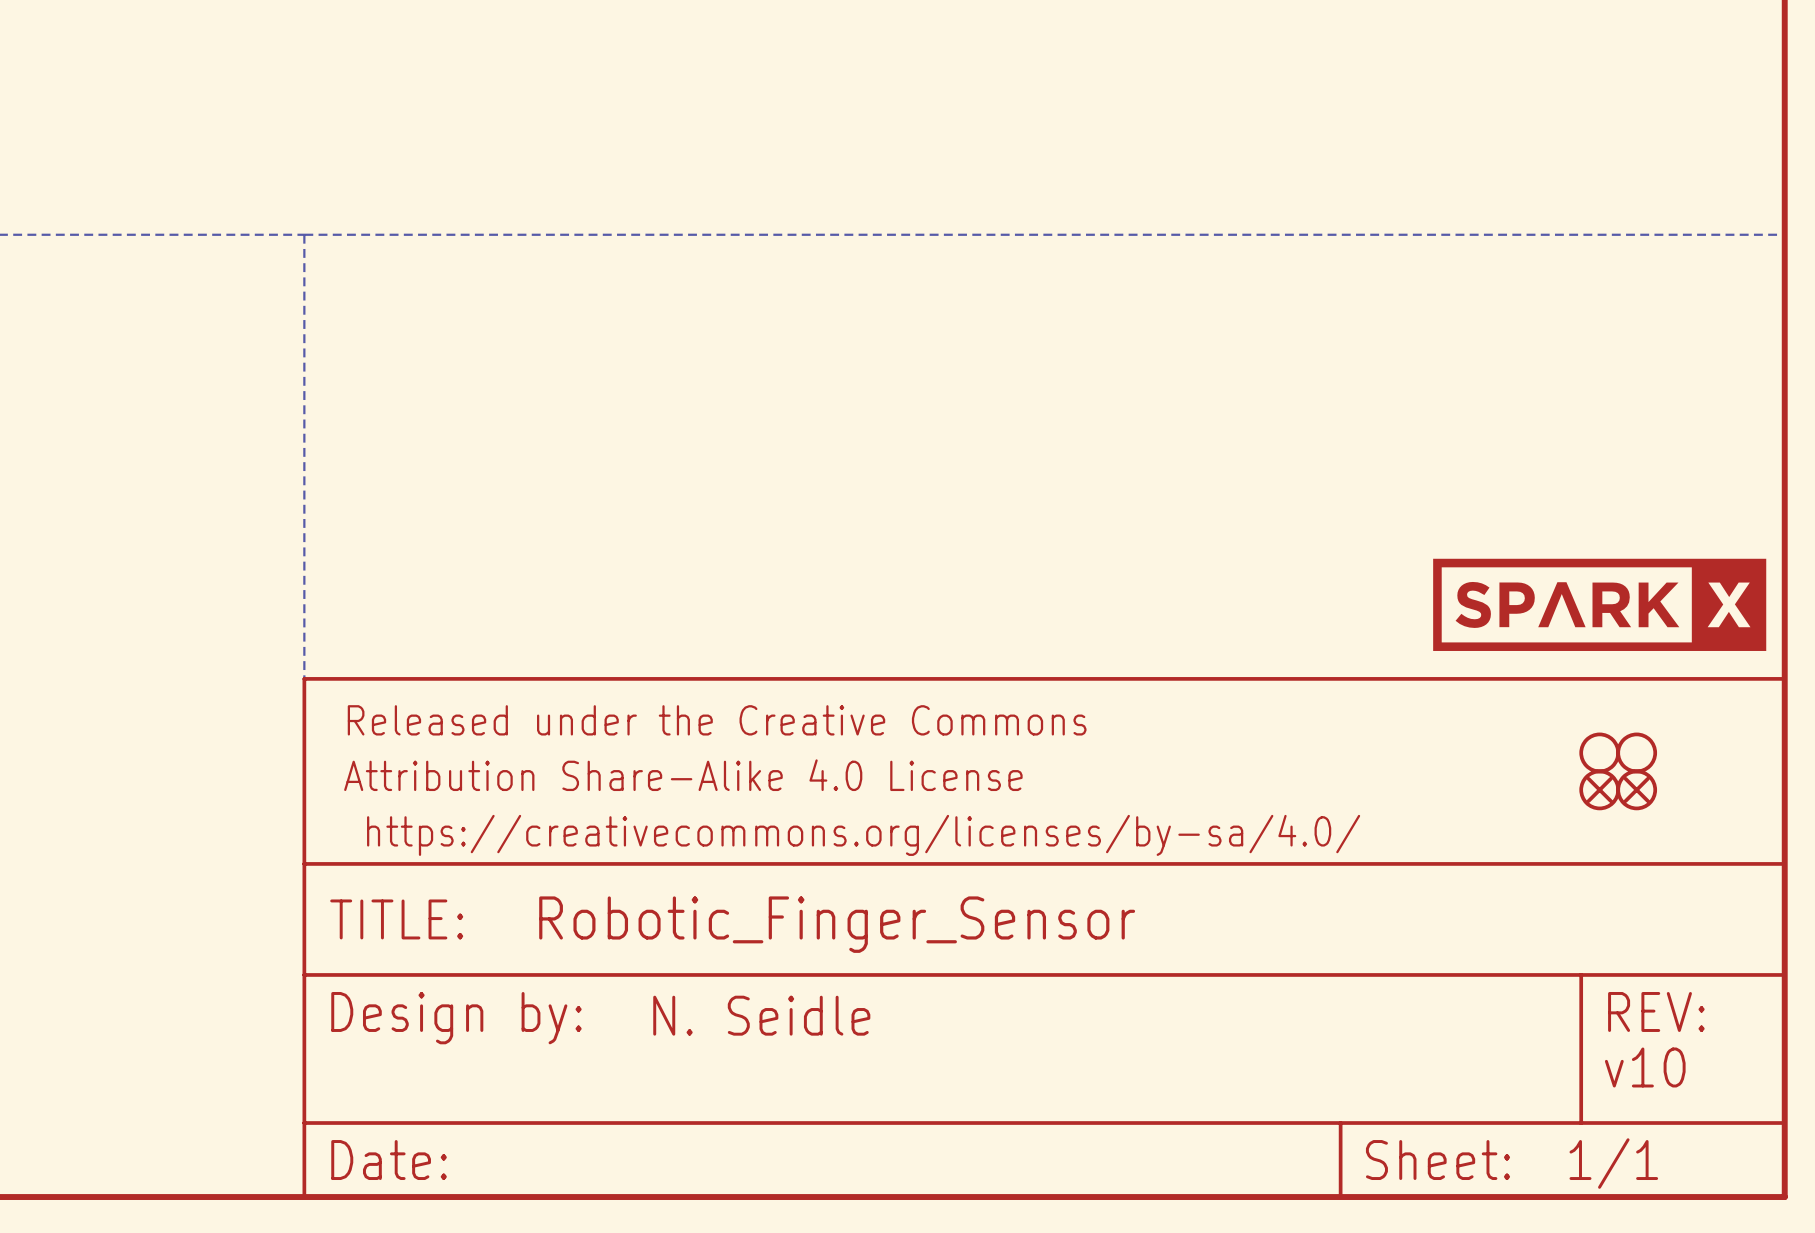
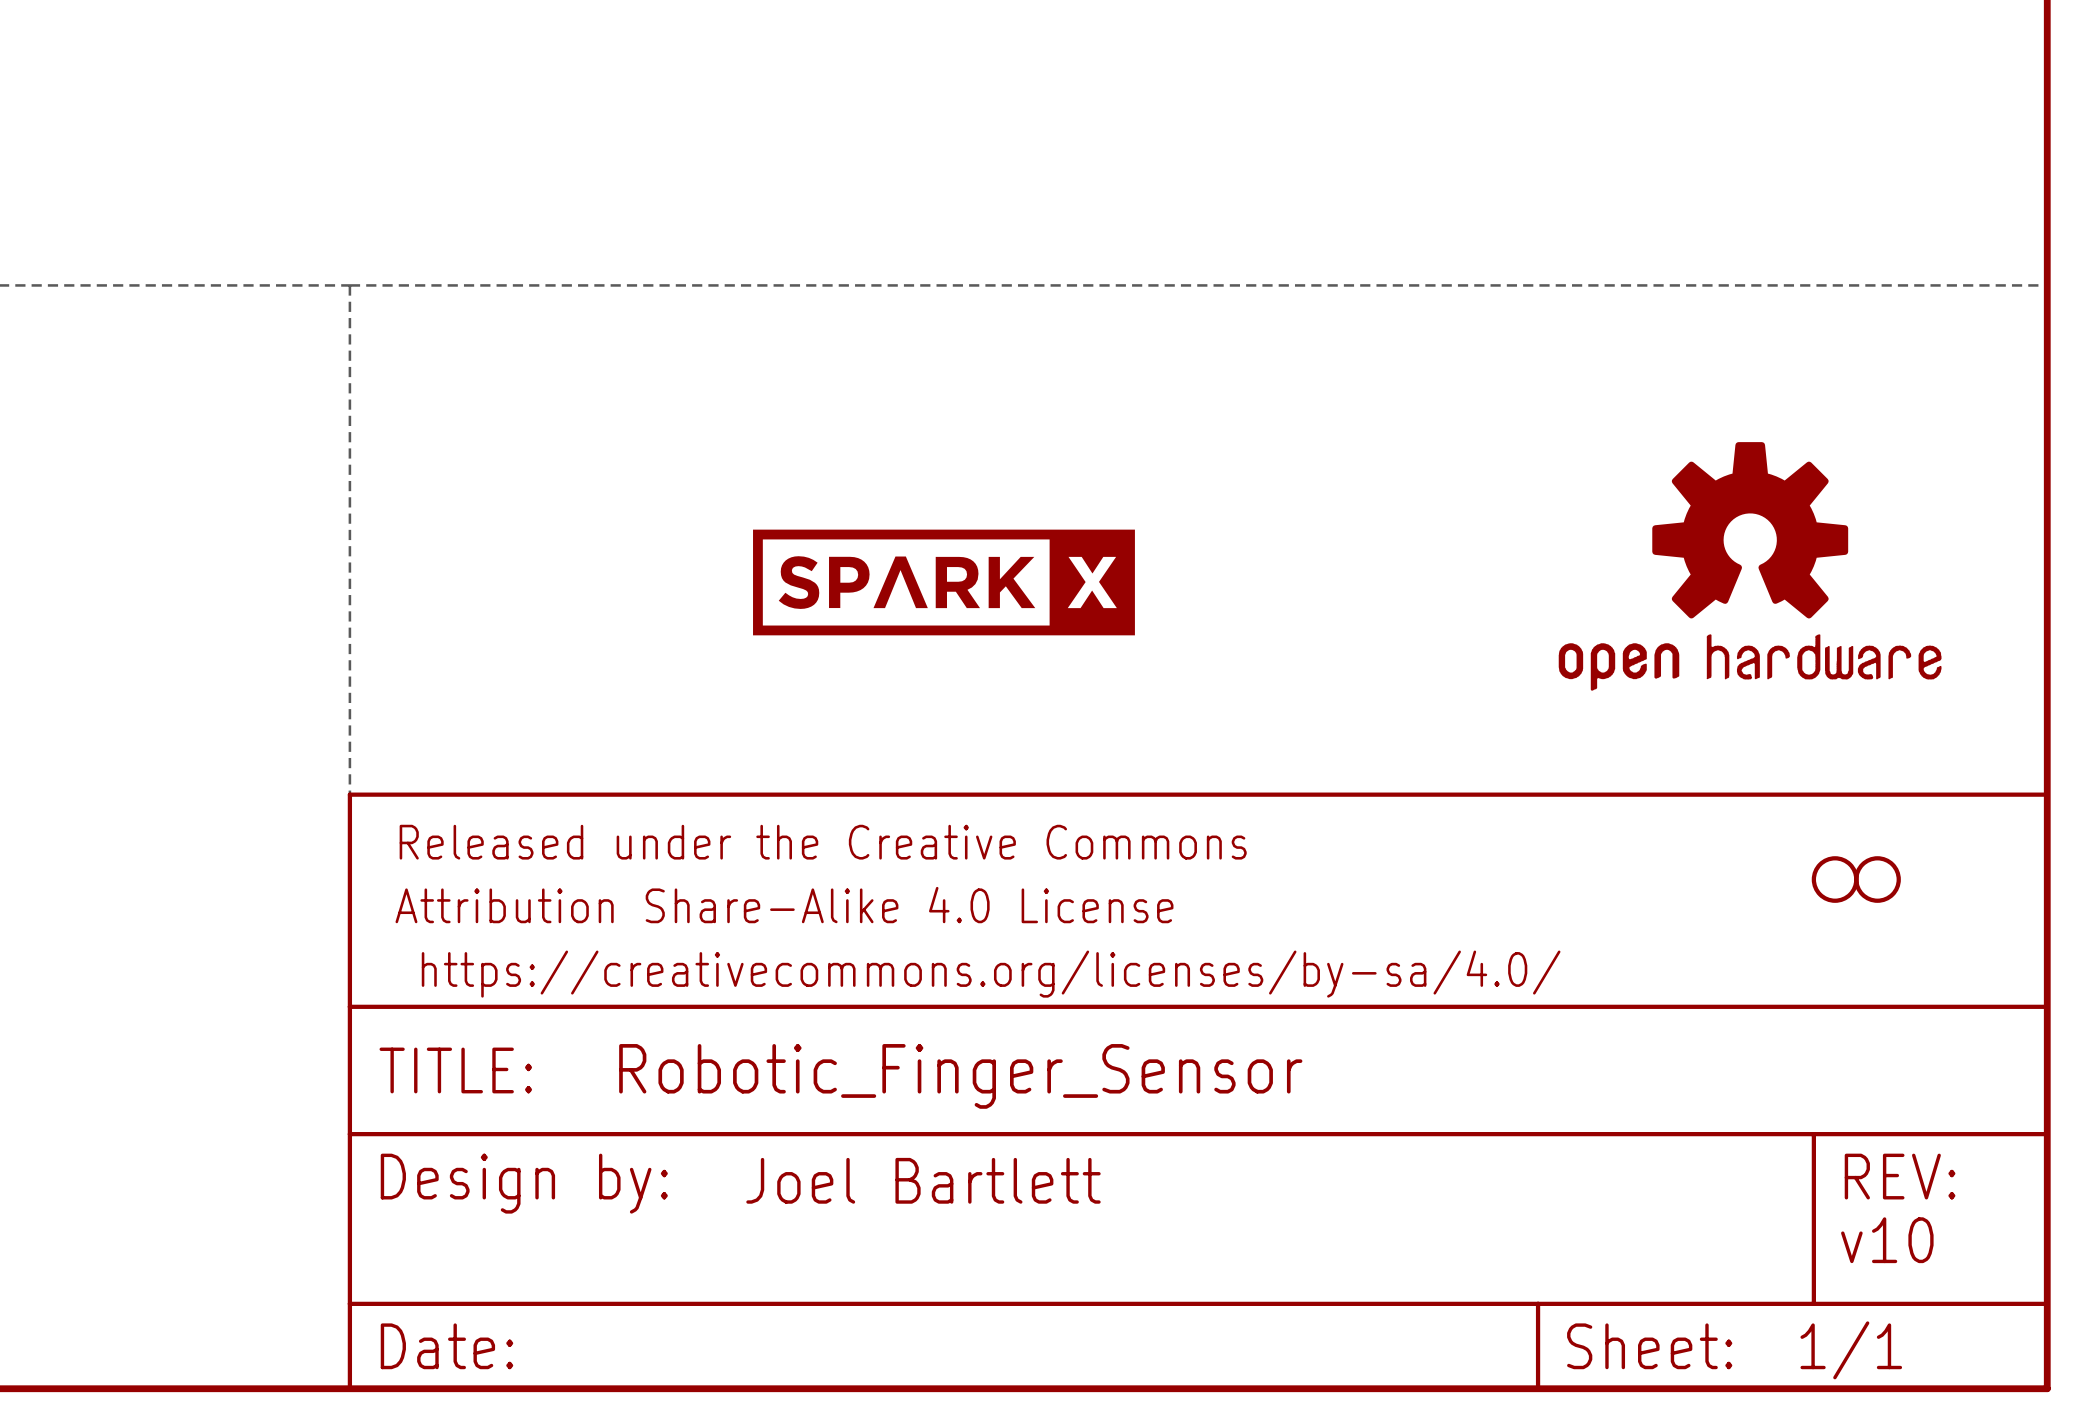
part: none -> (1750, 566)
part: none -> (943, 582)
part: (1599, 604) -> none
part: (1599, 789) -> none
part: (1636, 789) -> none
text: N. Seidle (761, 1015) -> Joel Bartlett (923, 1180)

